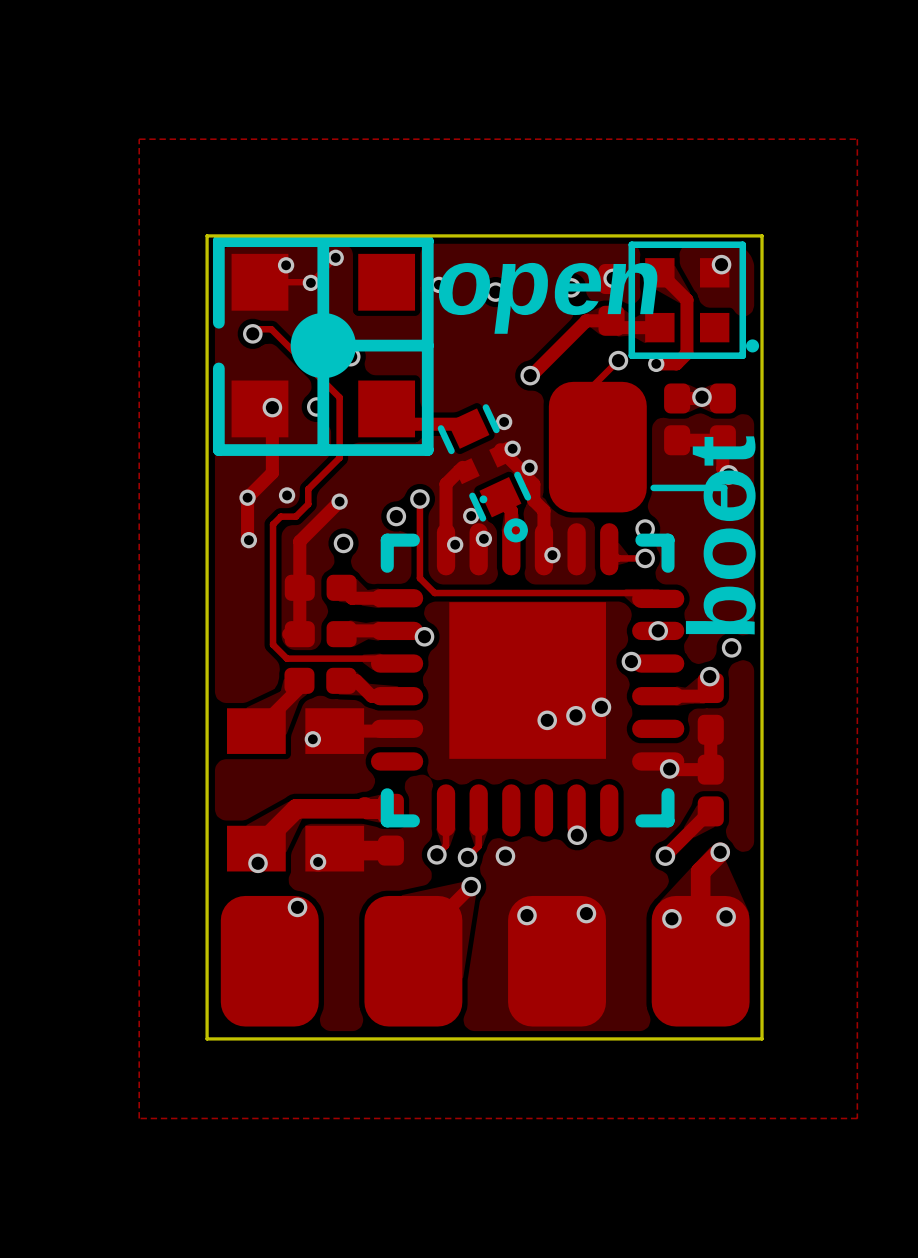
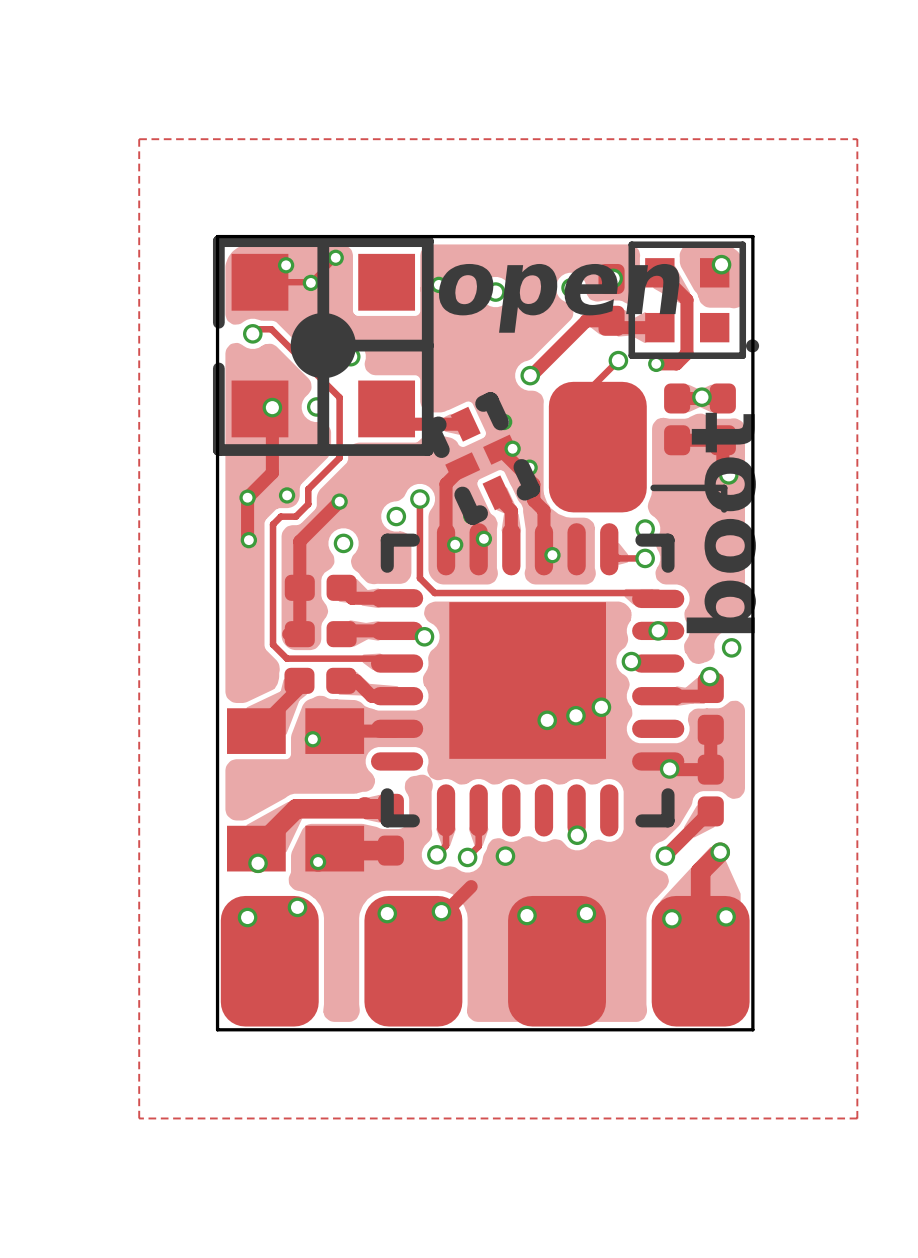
board edge: (207, 235) (762, 235) (762, 1038) (207, 1038) (207, 235) -> (217, 236) (217, 1029) (752, 1029) (752, 236) (217, 236)
part footprint: [437, 404, 532, 543] -> [423, 392, 541, 525]
via position: (471, 886) -> (441, 911)
via: none -> (387, 913)
via: none -> (247, 917)

